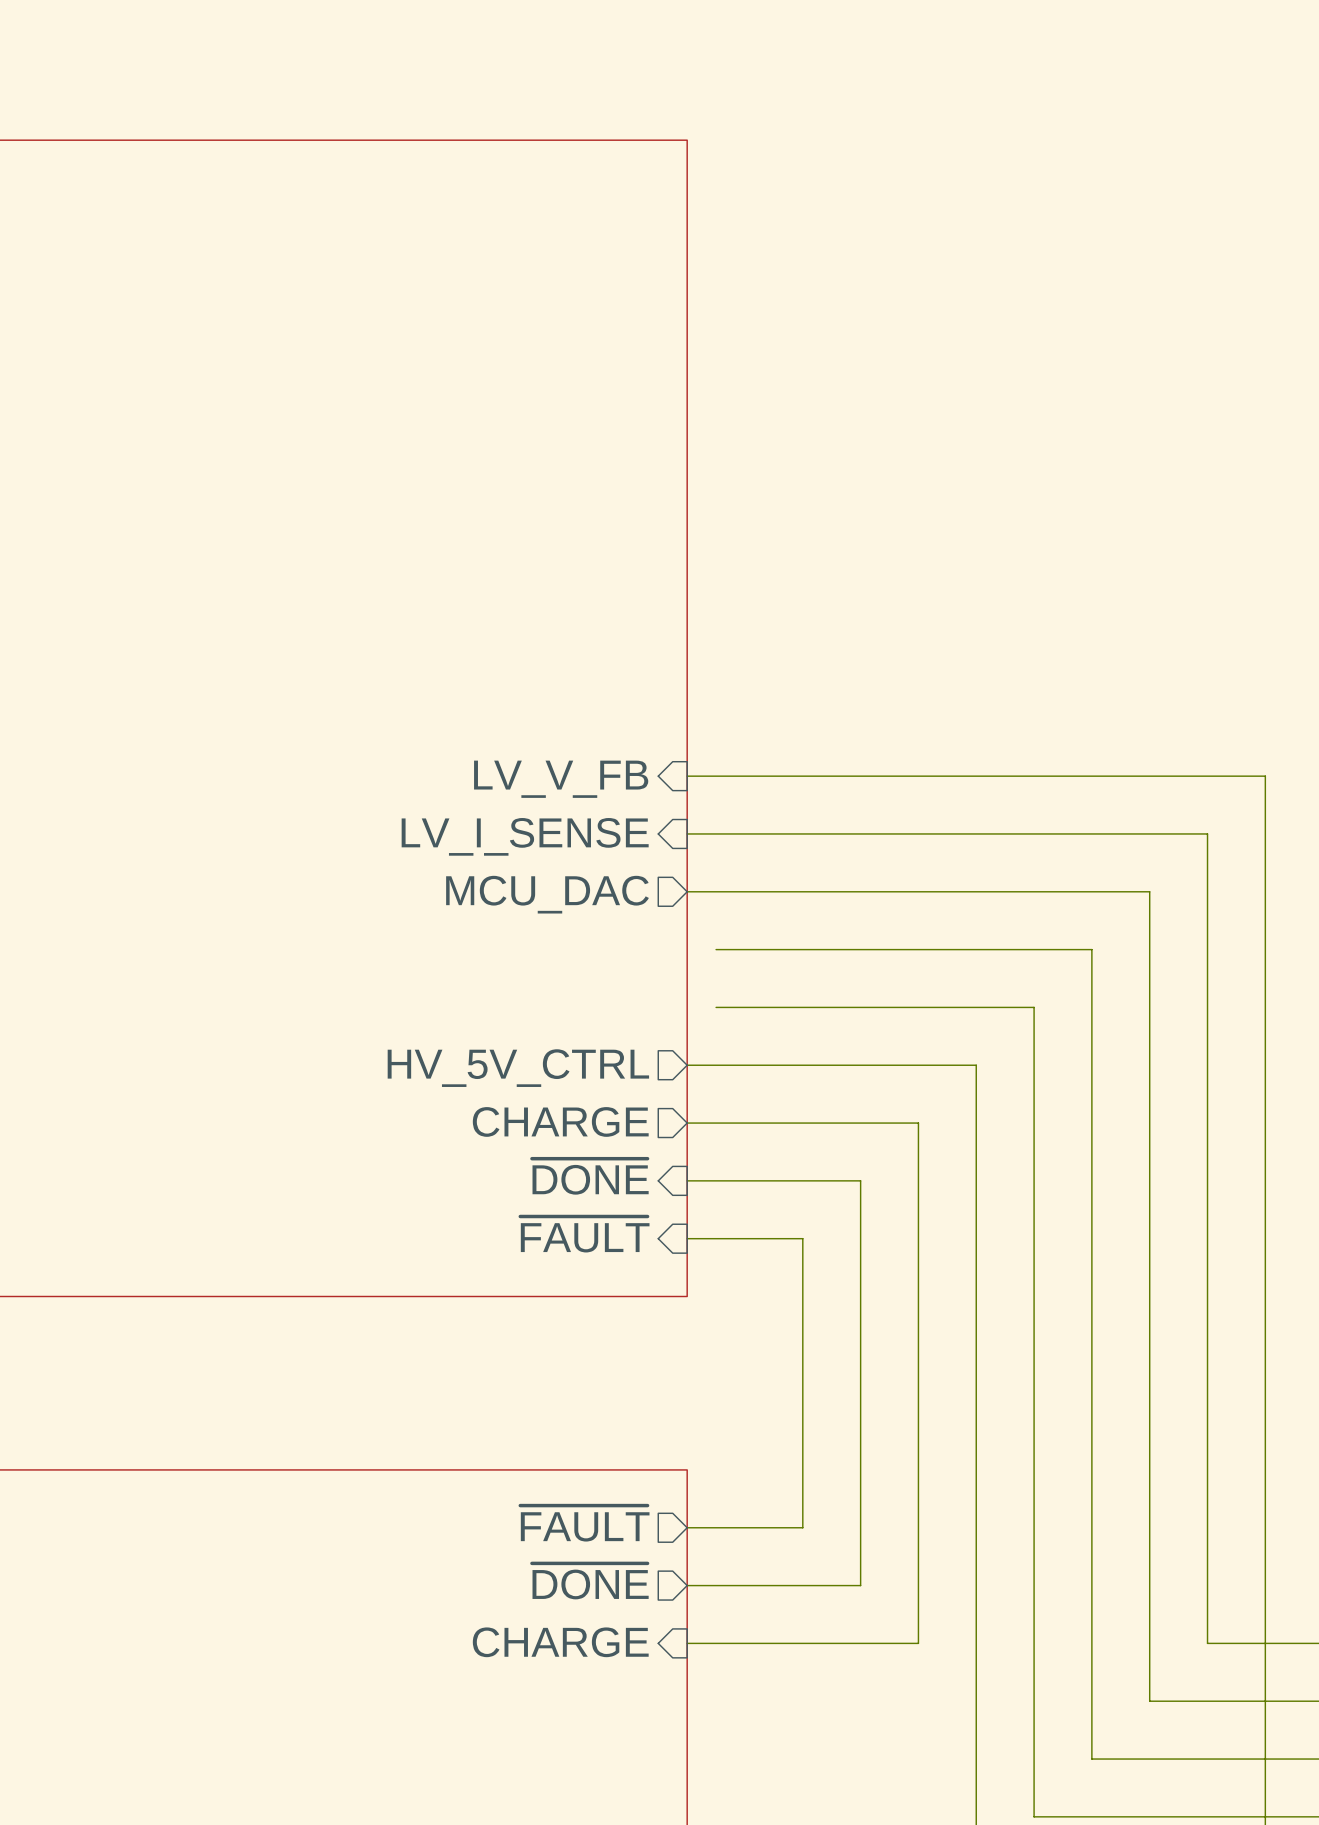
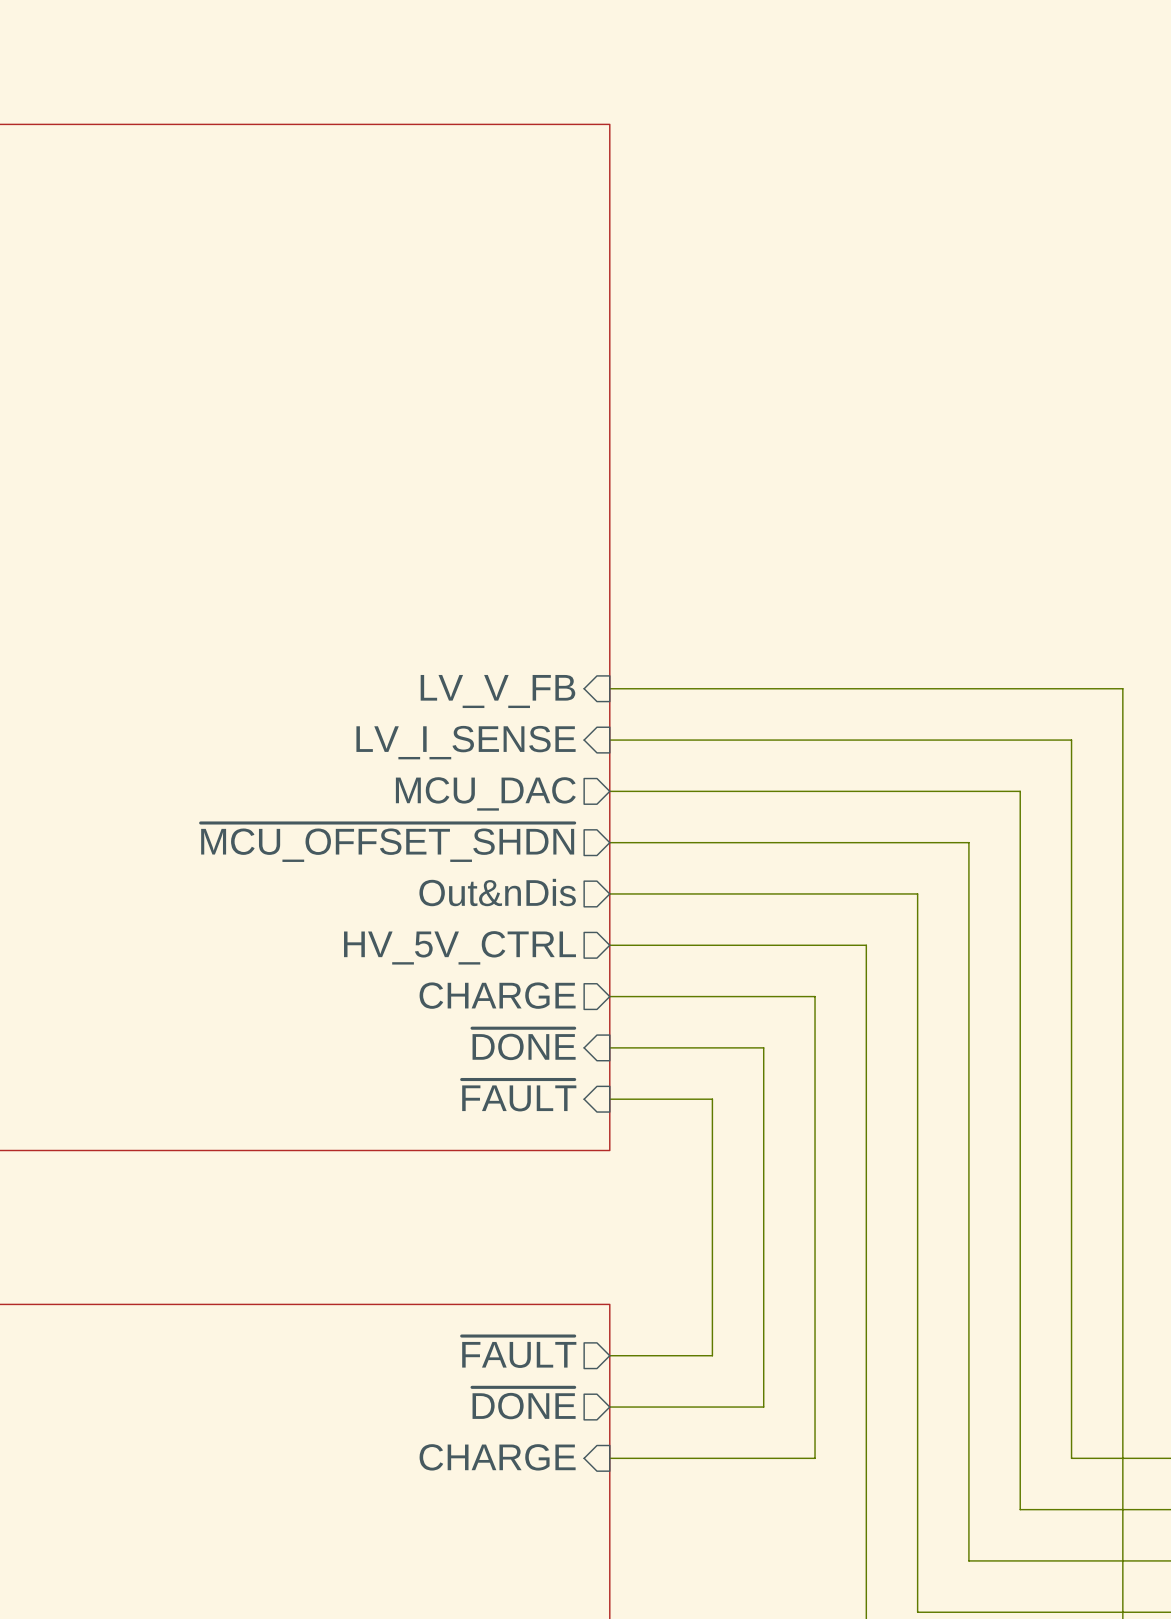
sheet pin: none -> ~{MCU_OFFSET_SHDN} (387, 842)
wire: none -> (609, 842) (635, 842)
sheet pin: none -> Out&nDis (497, 892)
wire: none -> (609, 893) (635, 893)

